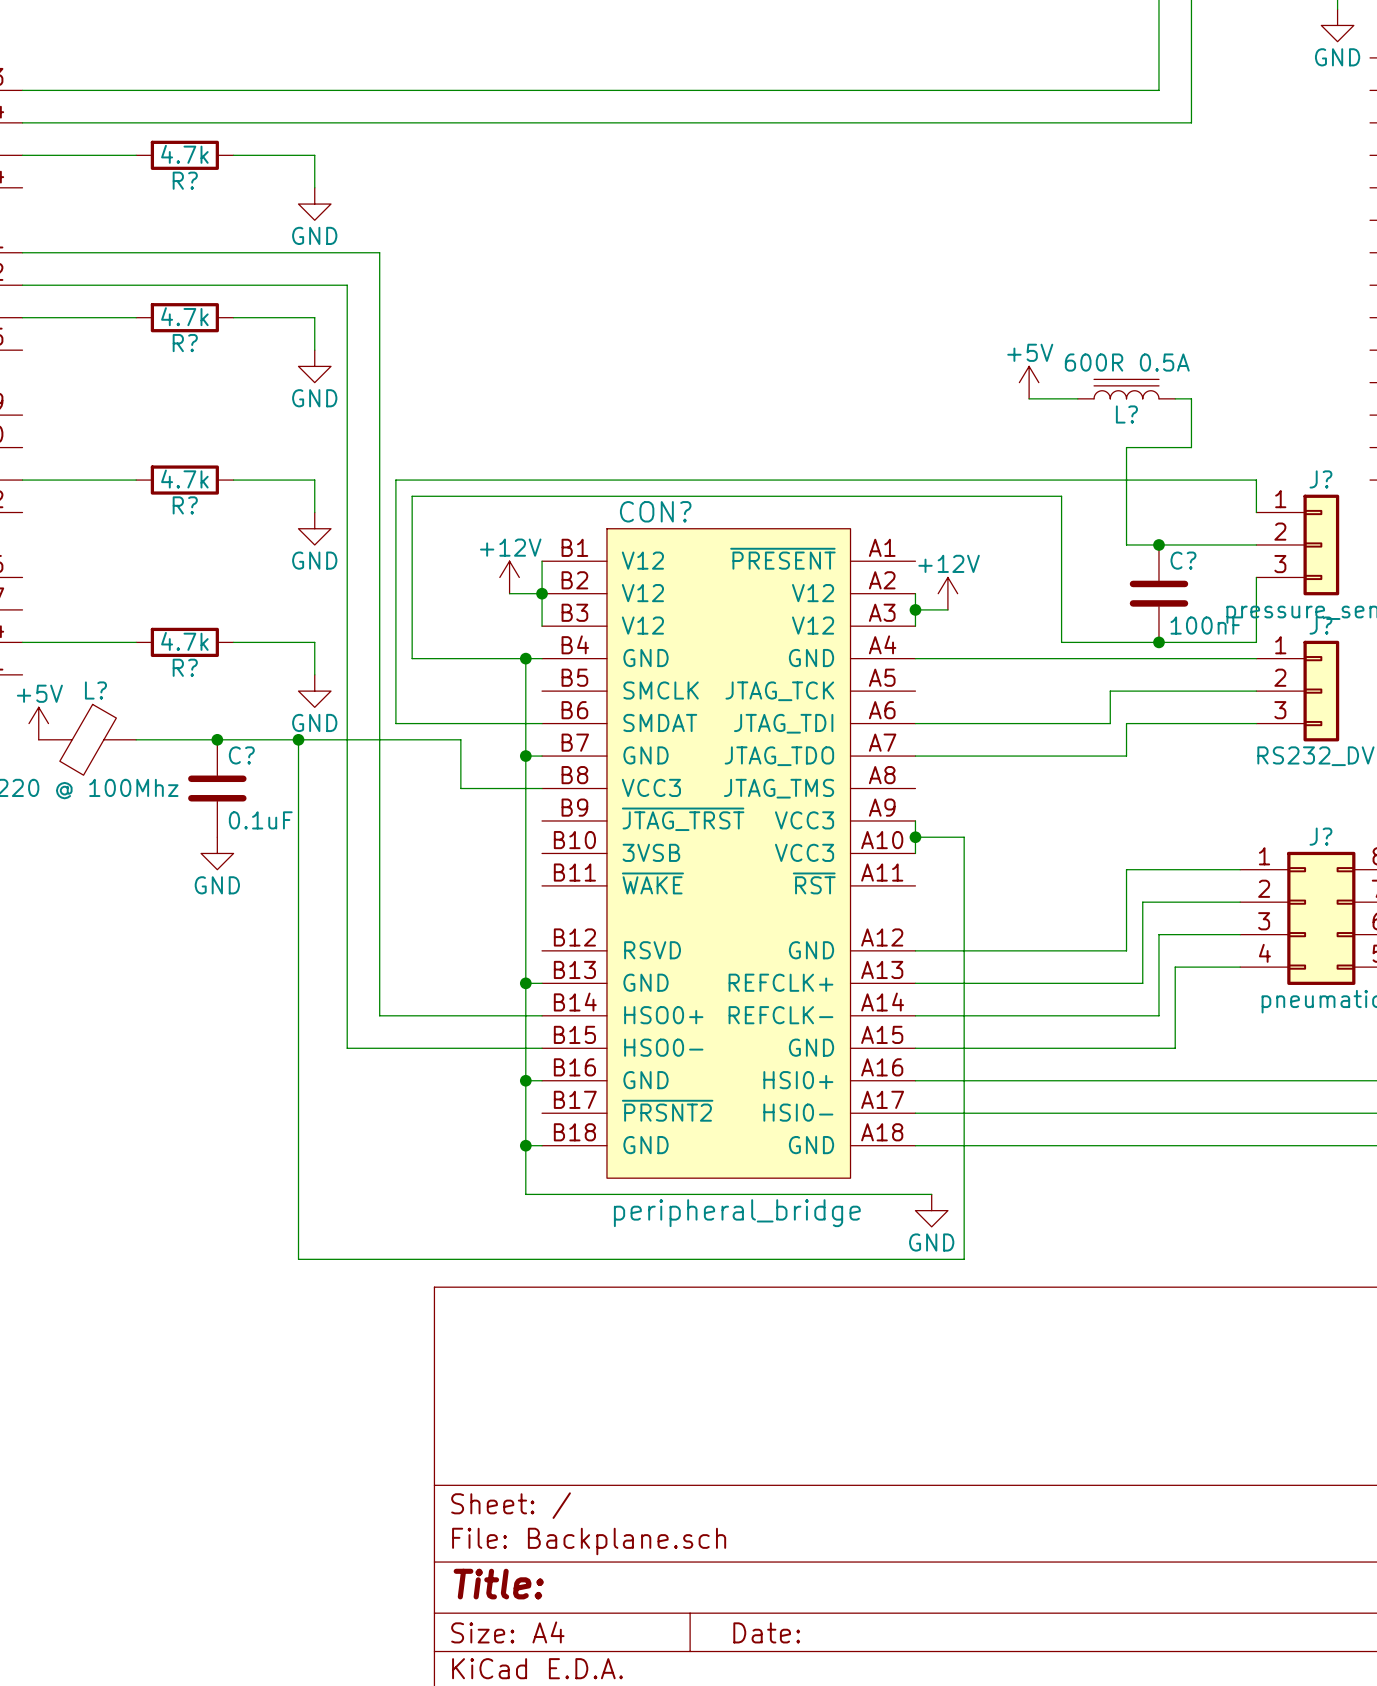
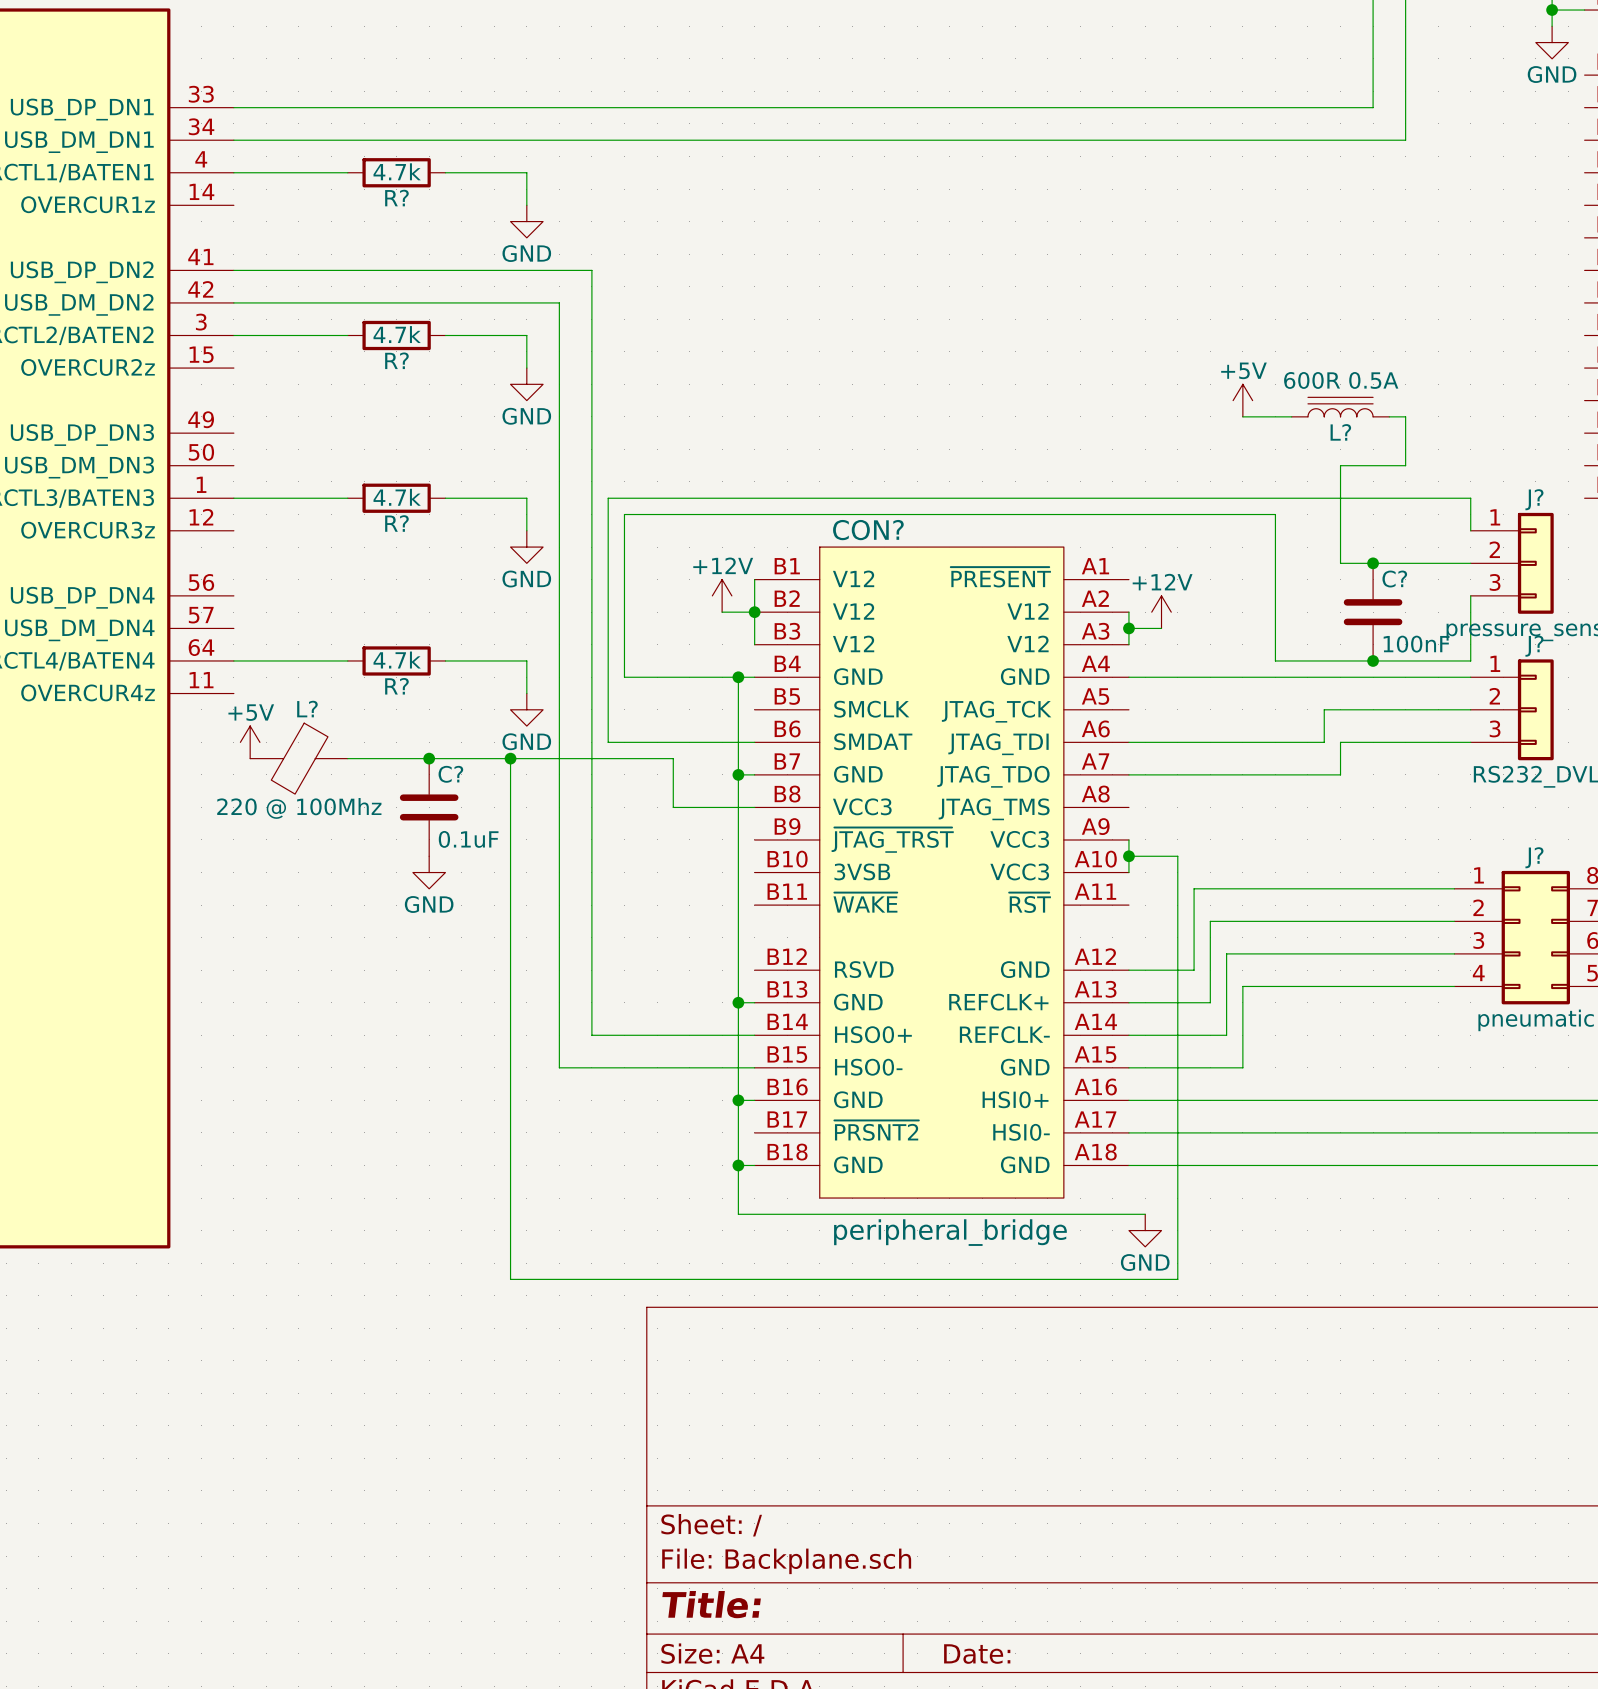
wire: (1126, 869) (1126, 950) (980, 950) -> (1340, 888) (1194, 888) (1194, 970)
wire: (1142, 902) (1142, 983) (996, 983) -> (1356, 921) (1210, 921) (1210, 1002)
wire: (1158, 934) (1158, 1015) (1012, 1015) -> (1373, 953) (1226, 953) (1226, 1035)
wire: (1175, 967) (1175, 1048) (1029, 1048) -> (1389, 986) (1242, 986) (1242, 1067)

